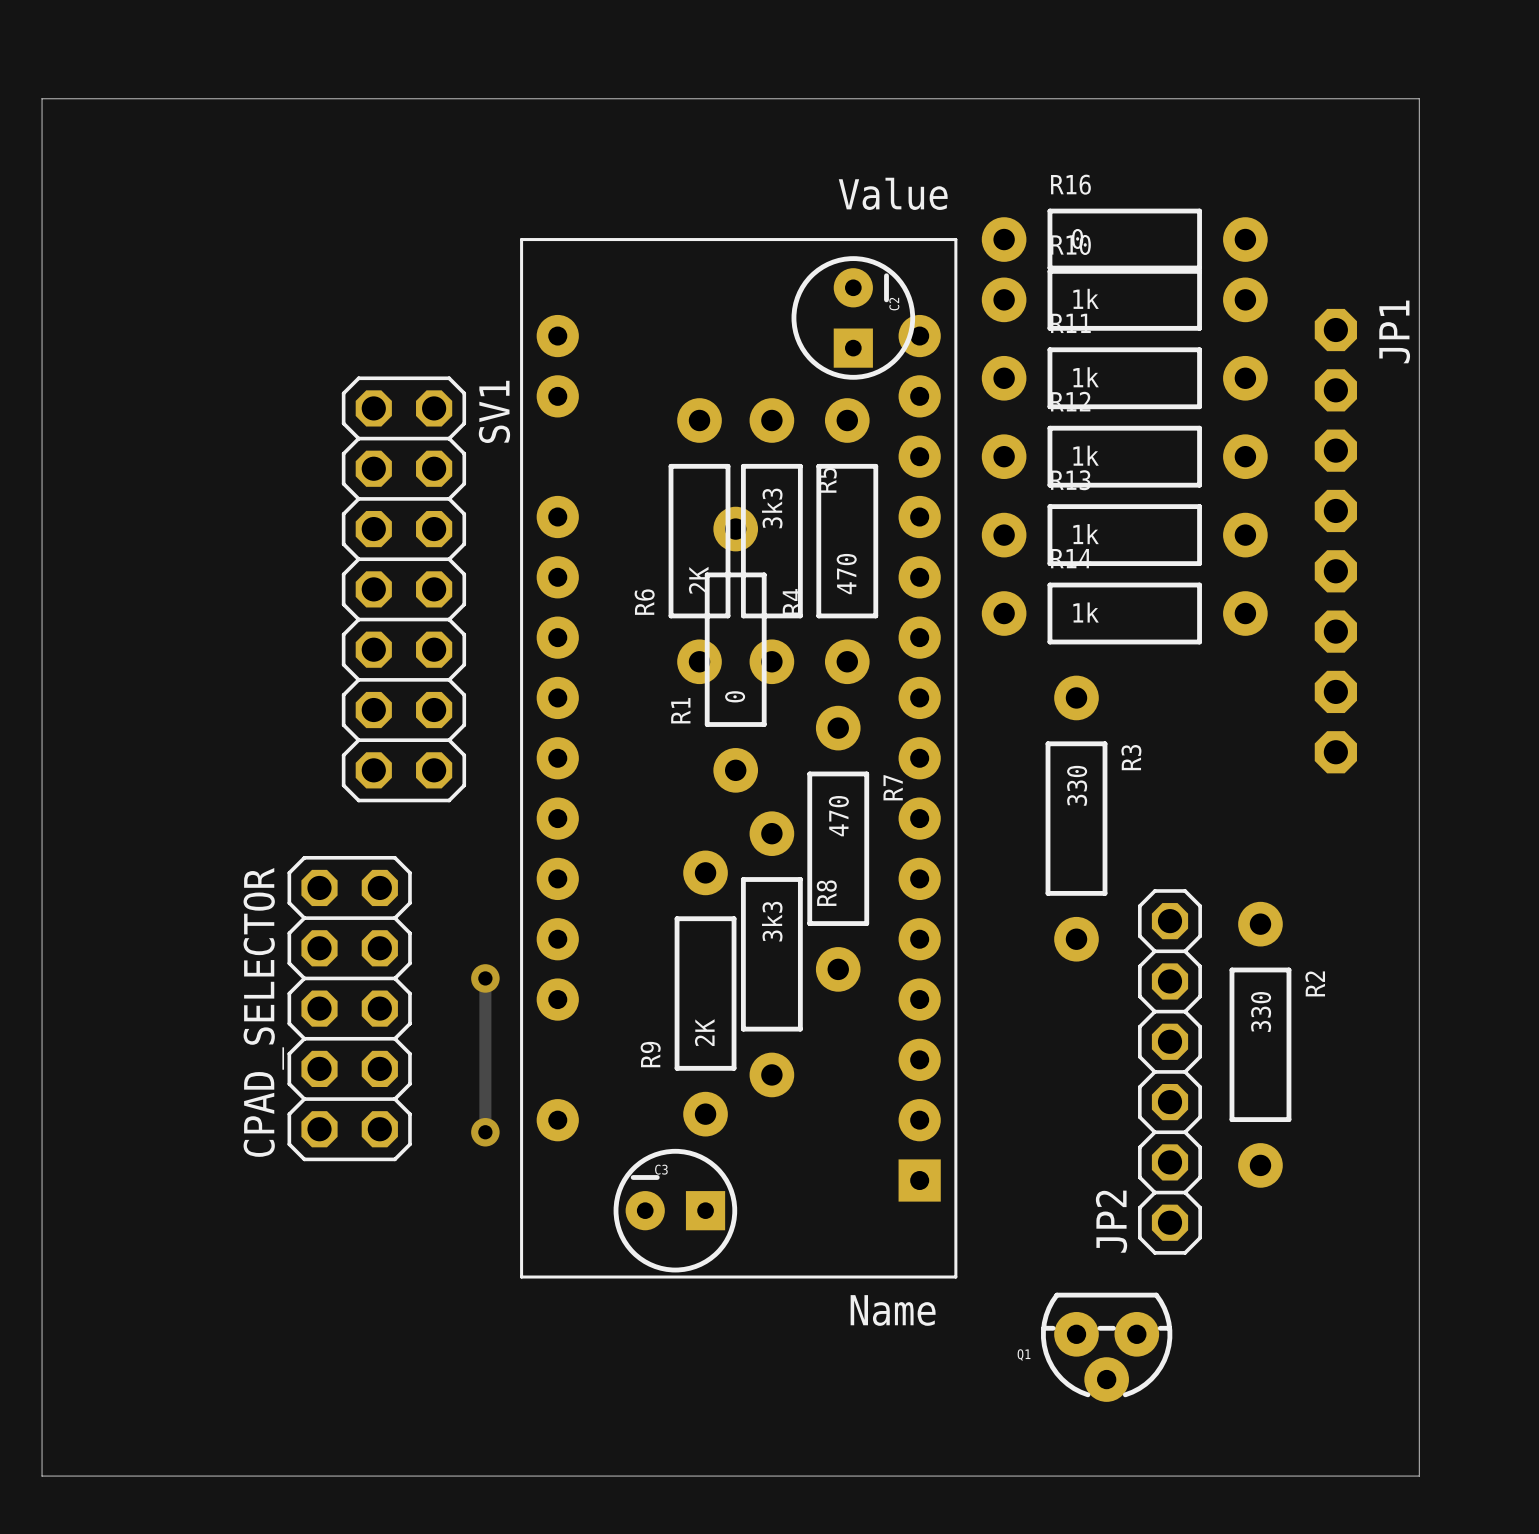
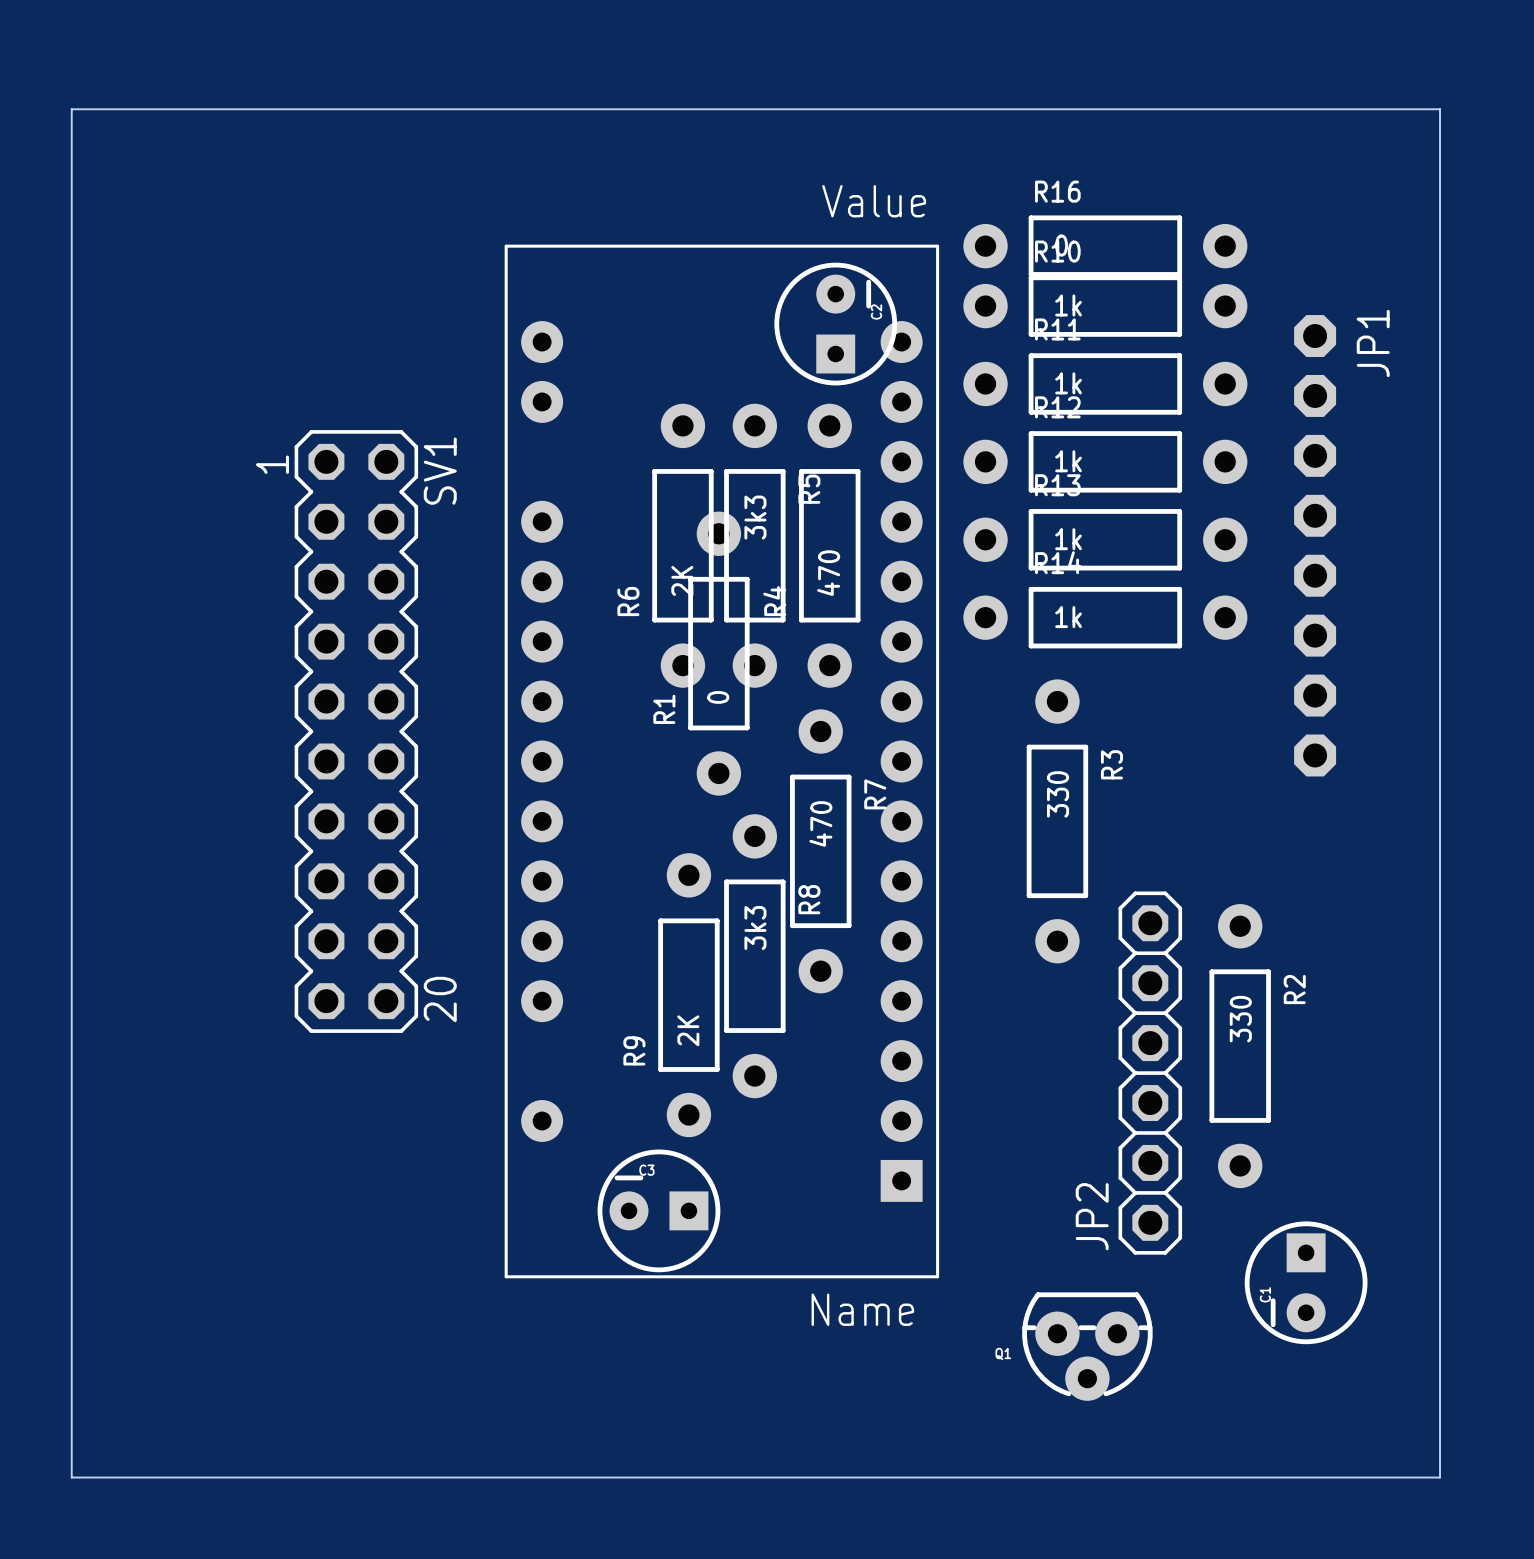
board edge: (42, 98) (1419, 98) (1419, 1476) (42, 1476) (42, 98) -> (71, 109) (71, 1477) (1440, 1477) (1440, 109) (71, 109)
SV1 footprint: [341, 376, 467, 803] -> [294, 430, 419, 1033]
SV1 name position: SV1 (494, 411) -> SV1 (440, 471)
track: (485, 978) (485, 1132) -> none
via: (485, 978) -> none
CPAD_SELECTOR: (349, 1008) -> none
via: (485, 1132) -> none
C1: none -> (1306, 1282)

